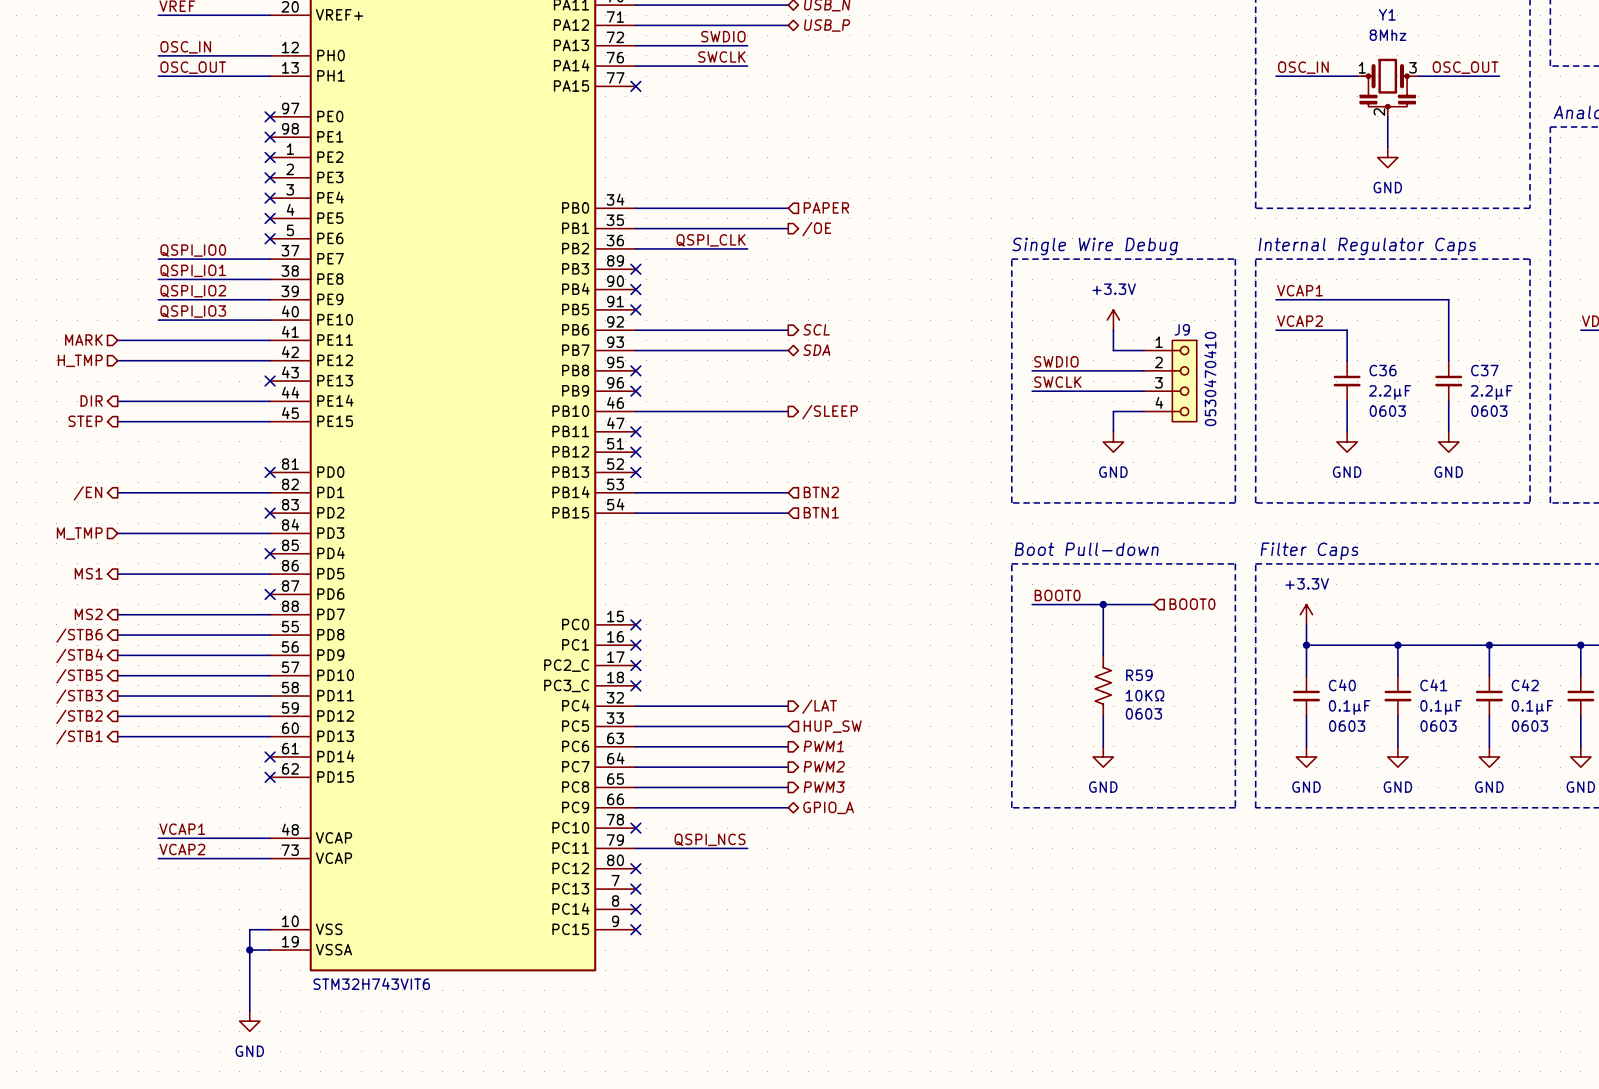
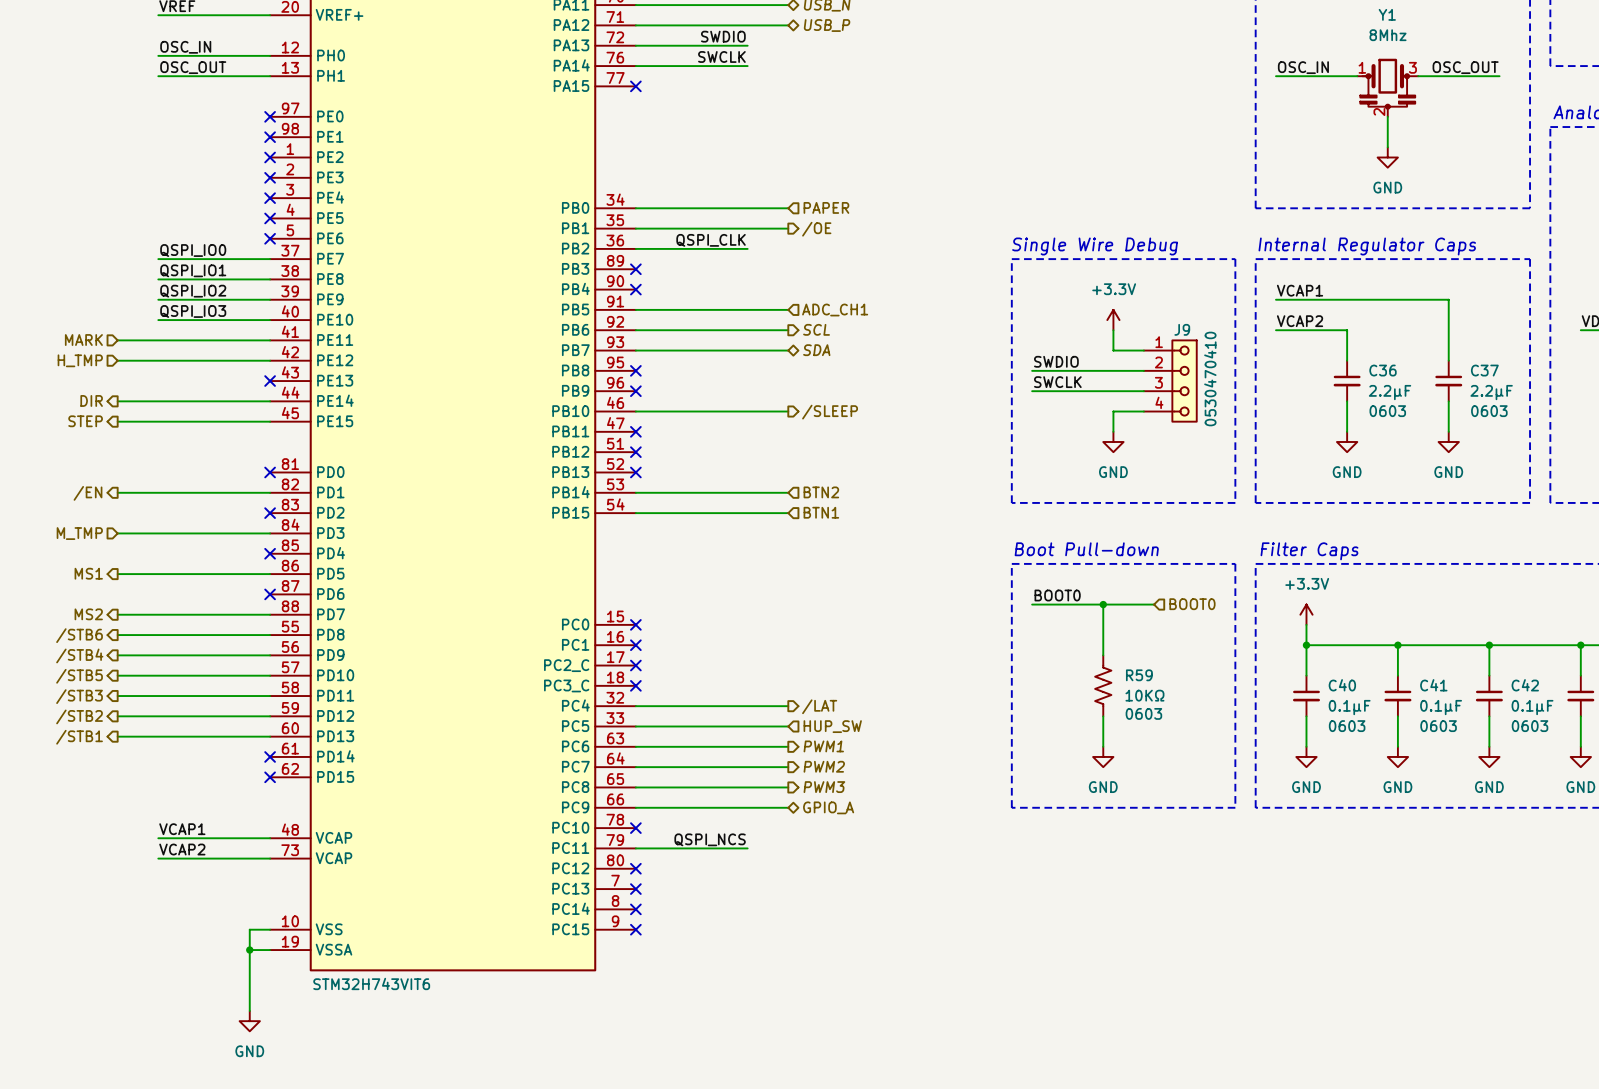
wire: none -> (635, 309) (788, 309)
no-connect mark: (635, 309) -> none
hierarchical label: none -> ADC_CH1 (835, 310)

